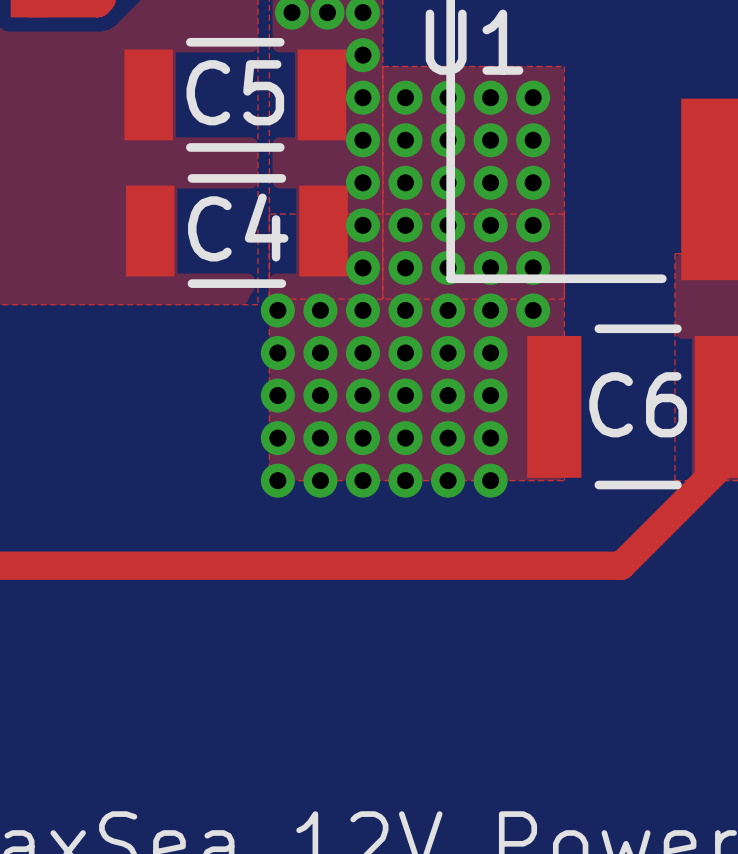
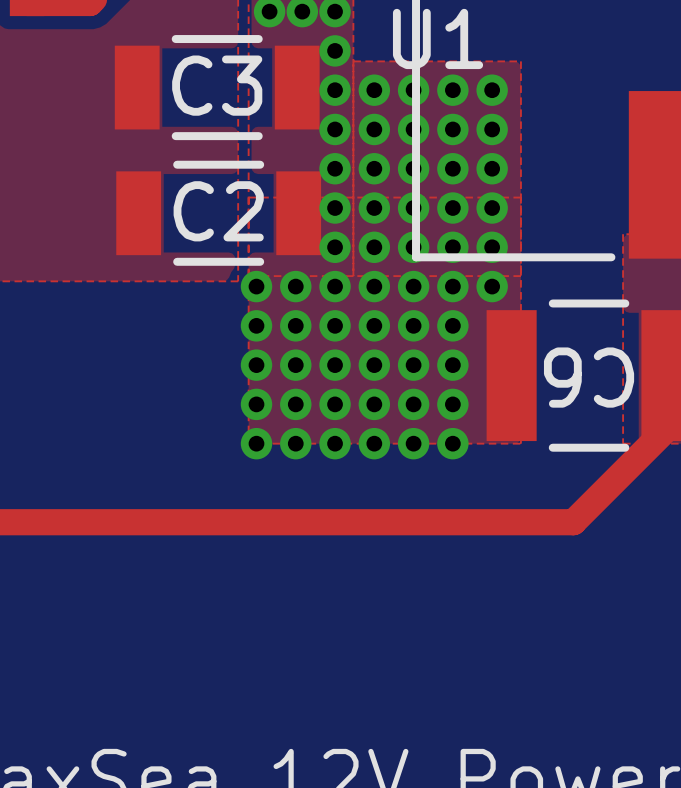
C5 name: C5 (235, 92) -> C3 (217, 85)
C4 name: C4 (238, 227) -> C2 (218, 211)
C6 name rotation: 0° (638, 404) -> 180° (589, 377)

